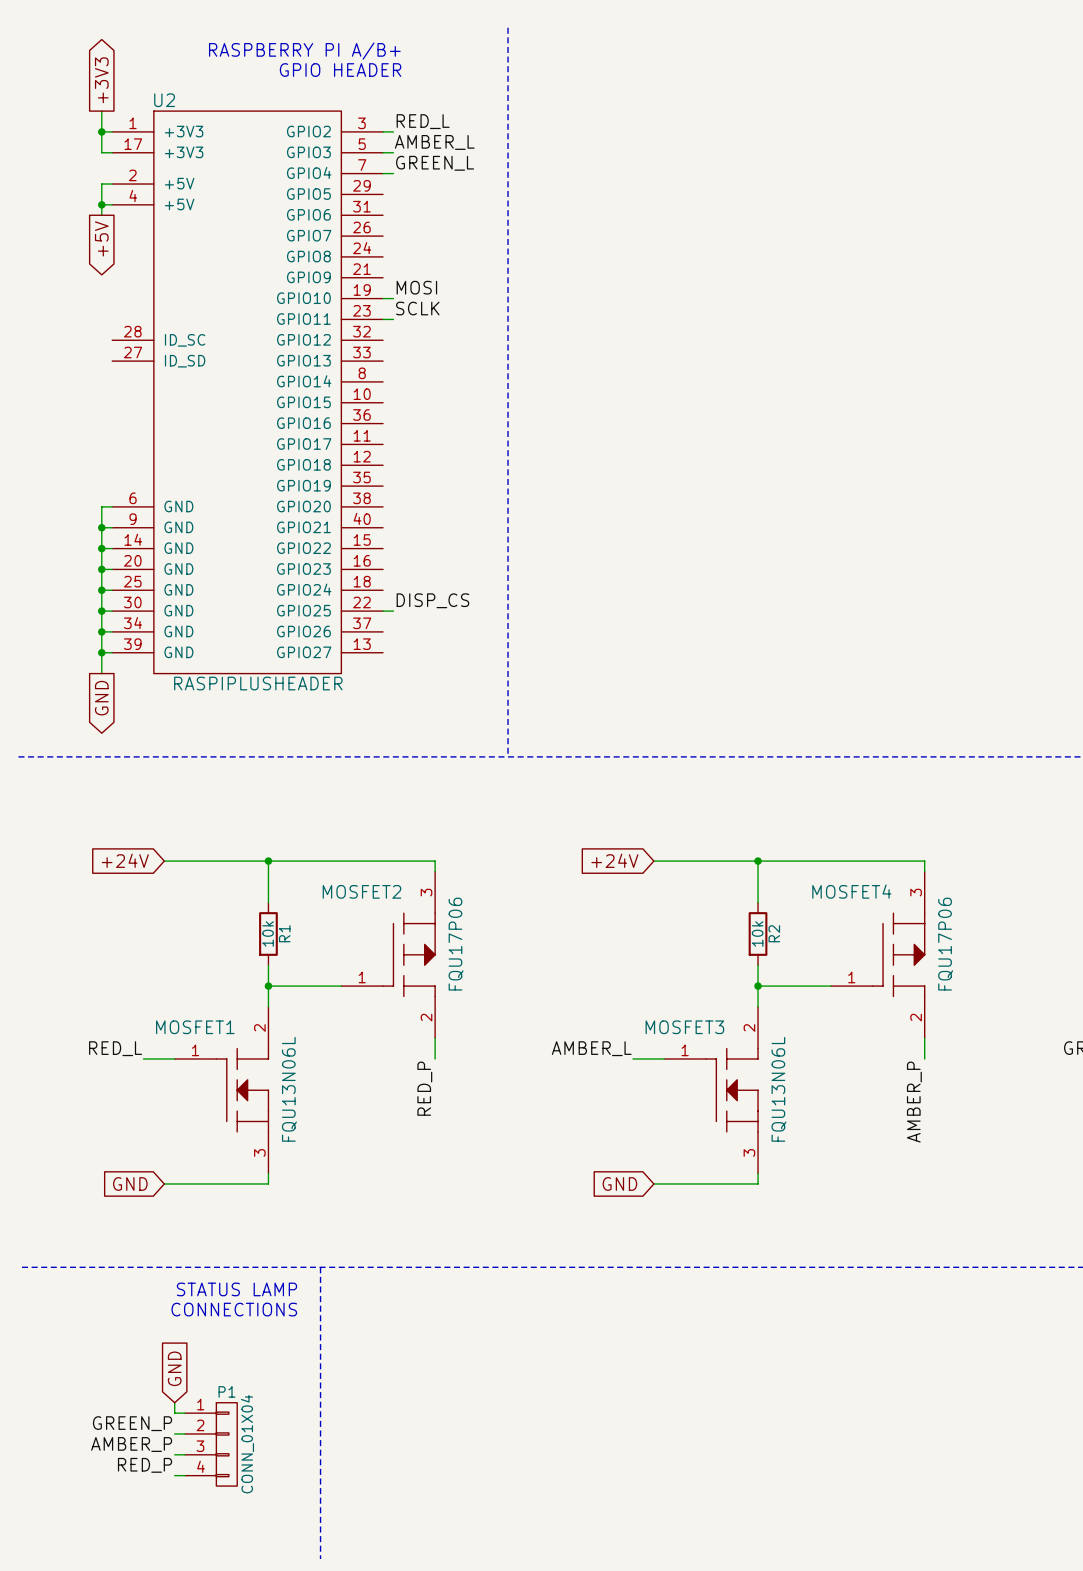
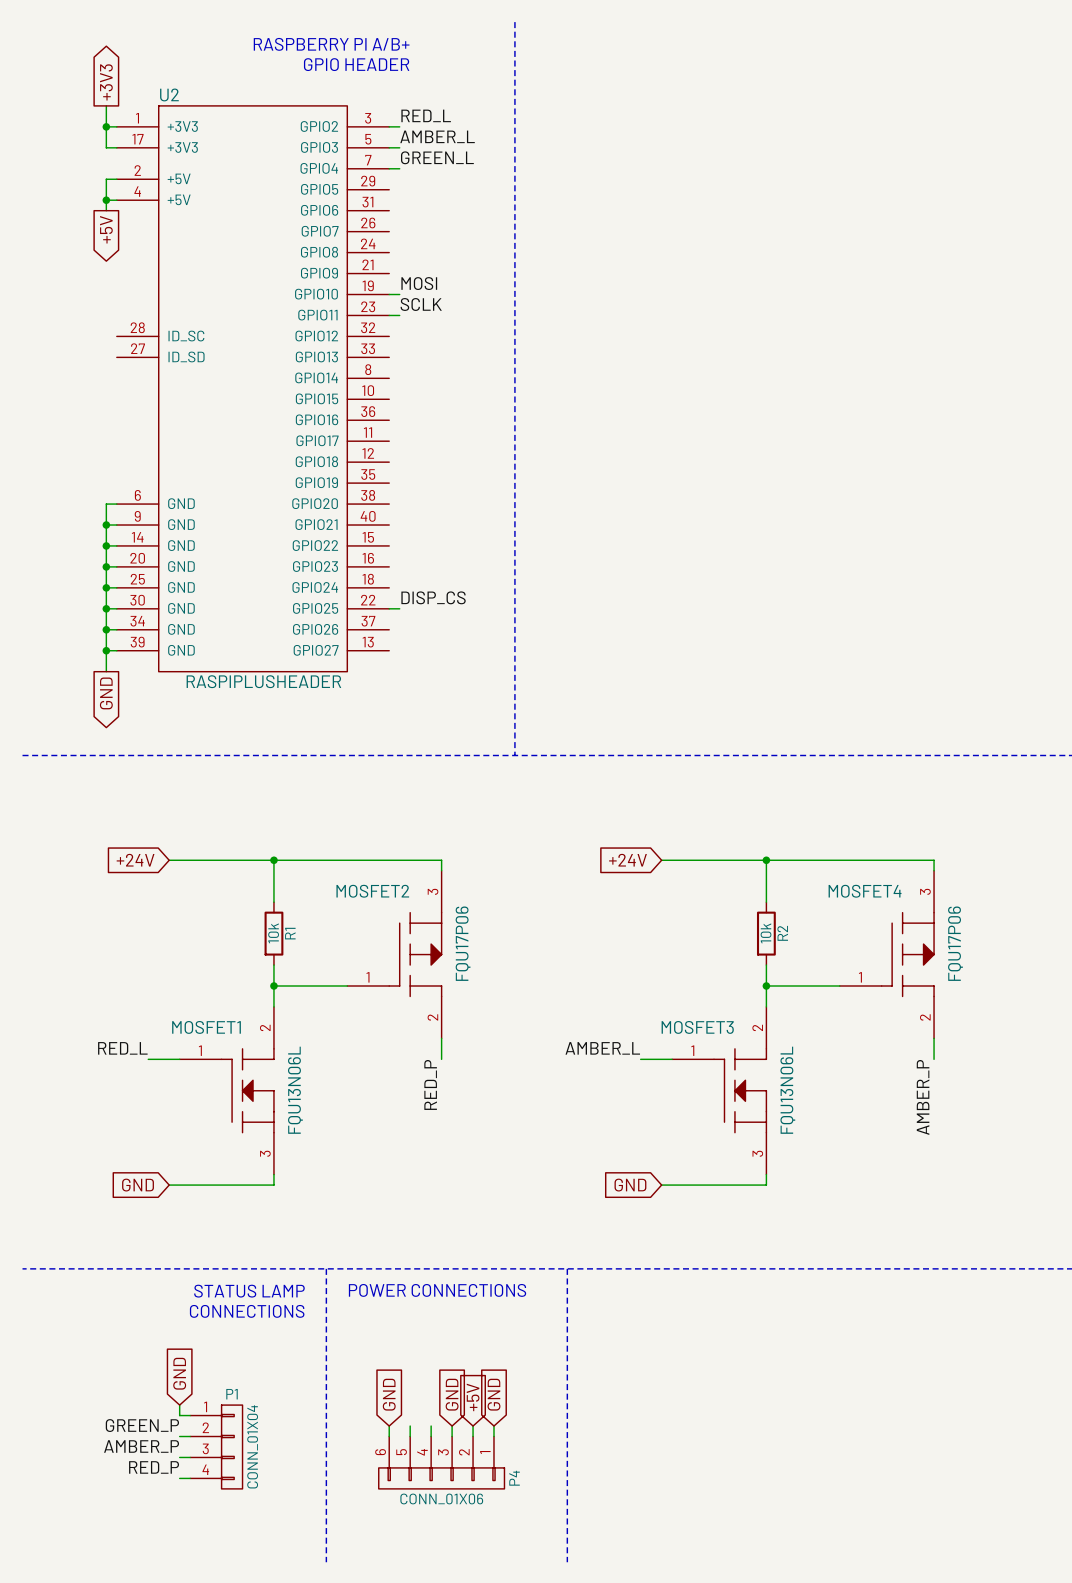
line: none -> (567, 1268) (567, 1562)
text: none -> POWER CONNECTIONS (437, 1290)
global label: none -> +5V (473, 1397)
global label: none -> GND (389, 1394)
global label: none -> GND (452, 1394)
global label: none -> GND (493, 1394)
wire: none -> (389, 1426) (389, 1436)
wire: none -> (410, 1426) (410, 1436)
wire: none -> (431, 1426) (431, 1436)
wire: none -> (452, 1426) (452, 1436)
wire: none -> (473, 1426) (473, 1436)
wire: none -> (493, 1426) (493, 1436)
P4: none -> CONN_01X06 (441, 1462)

